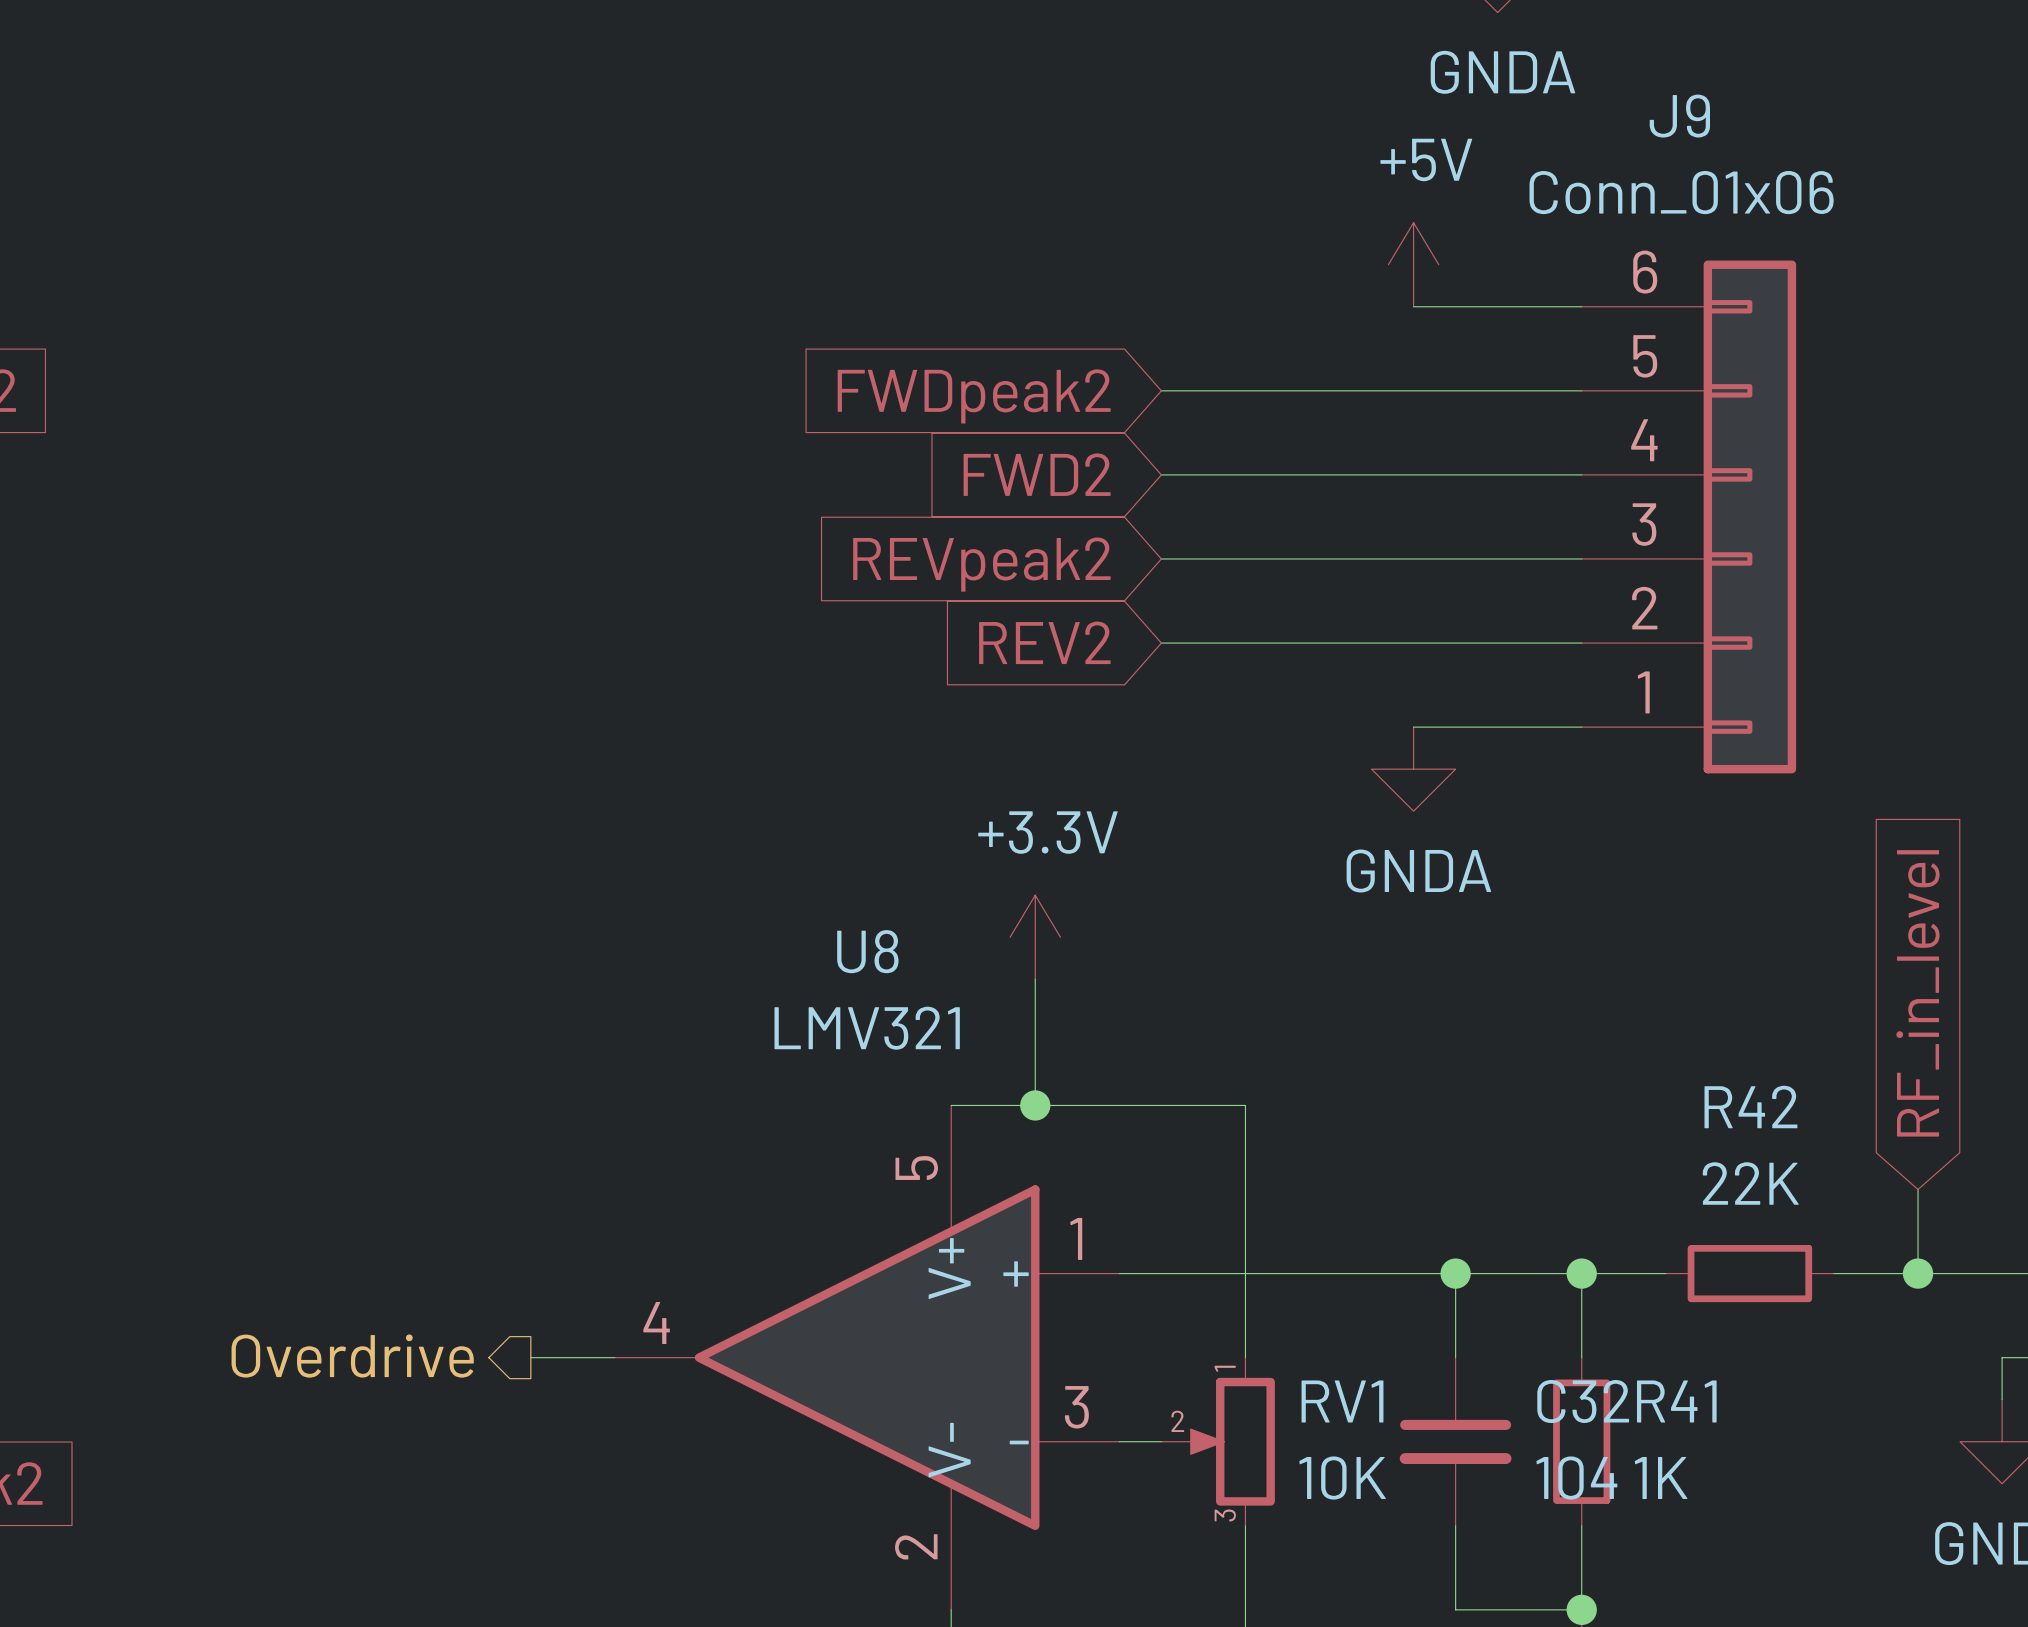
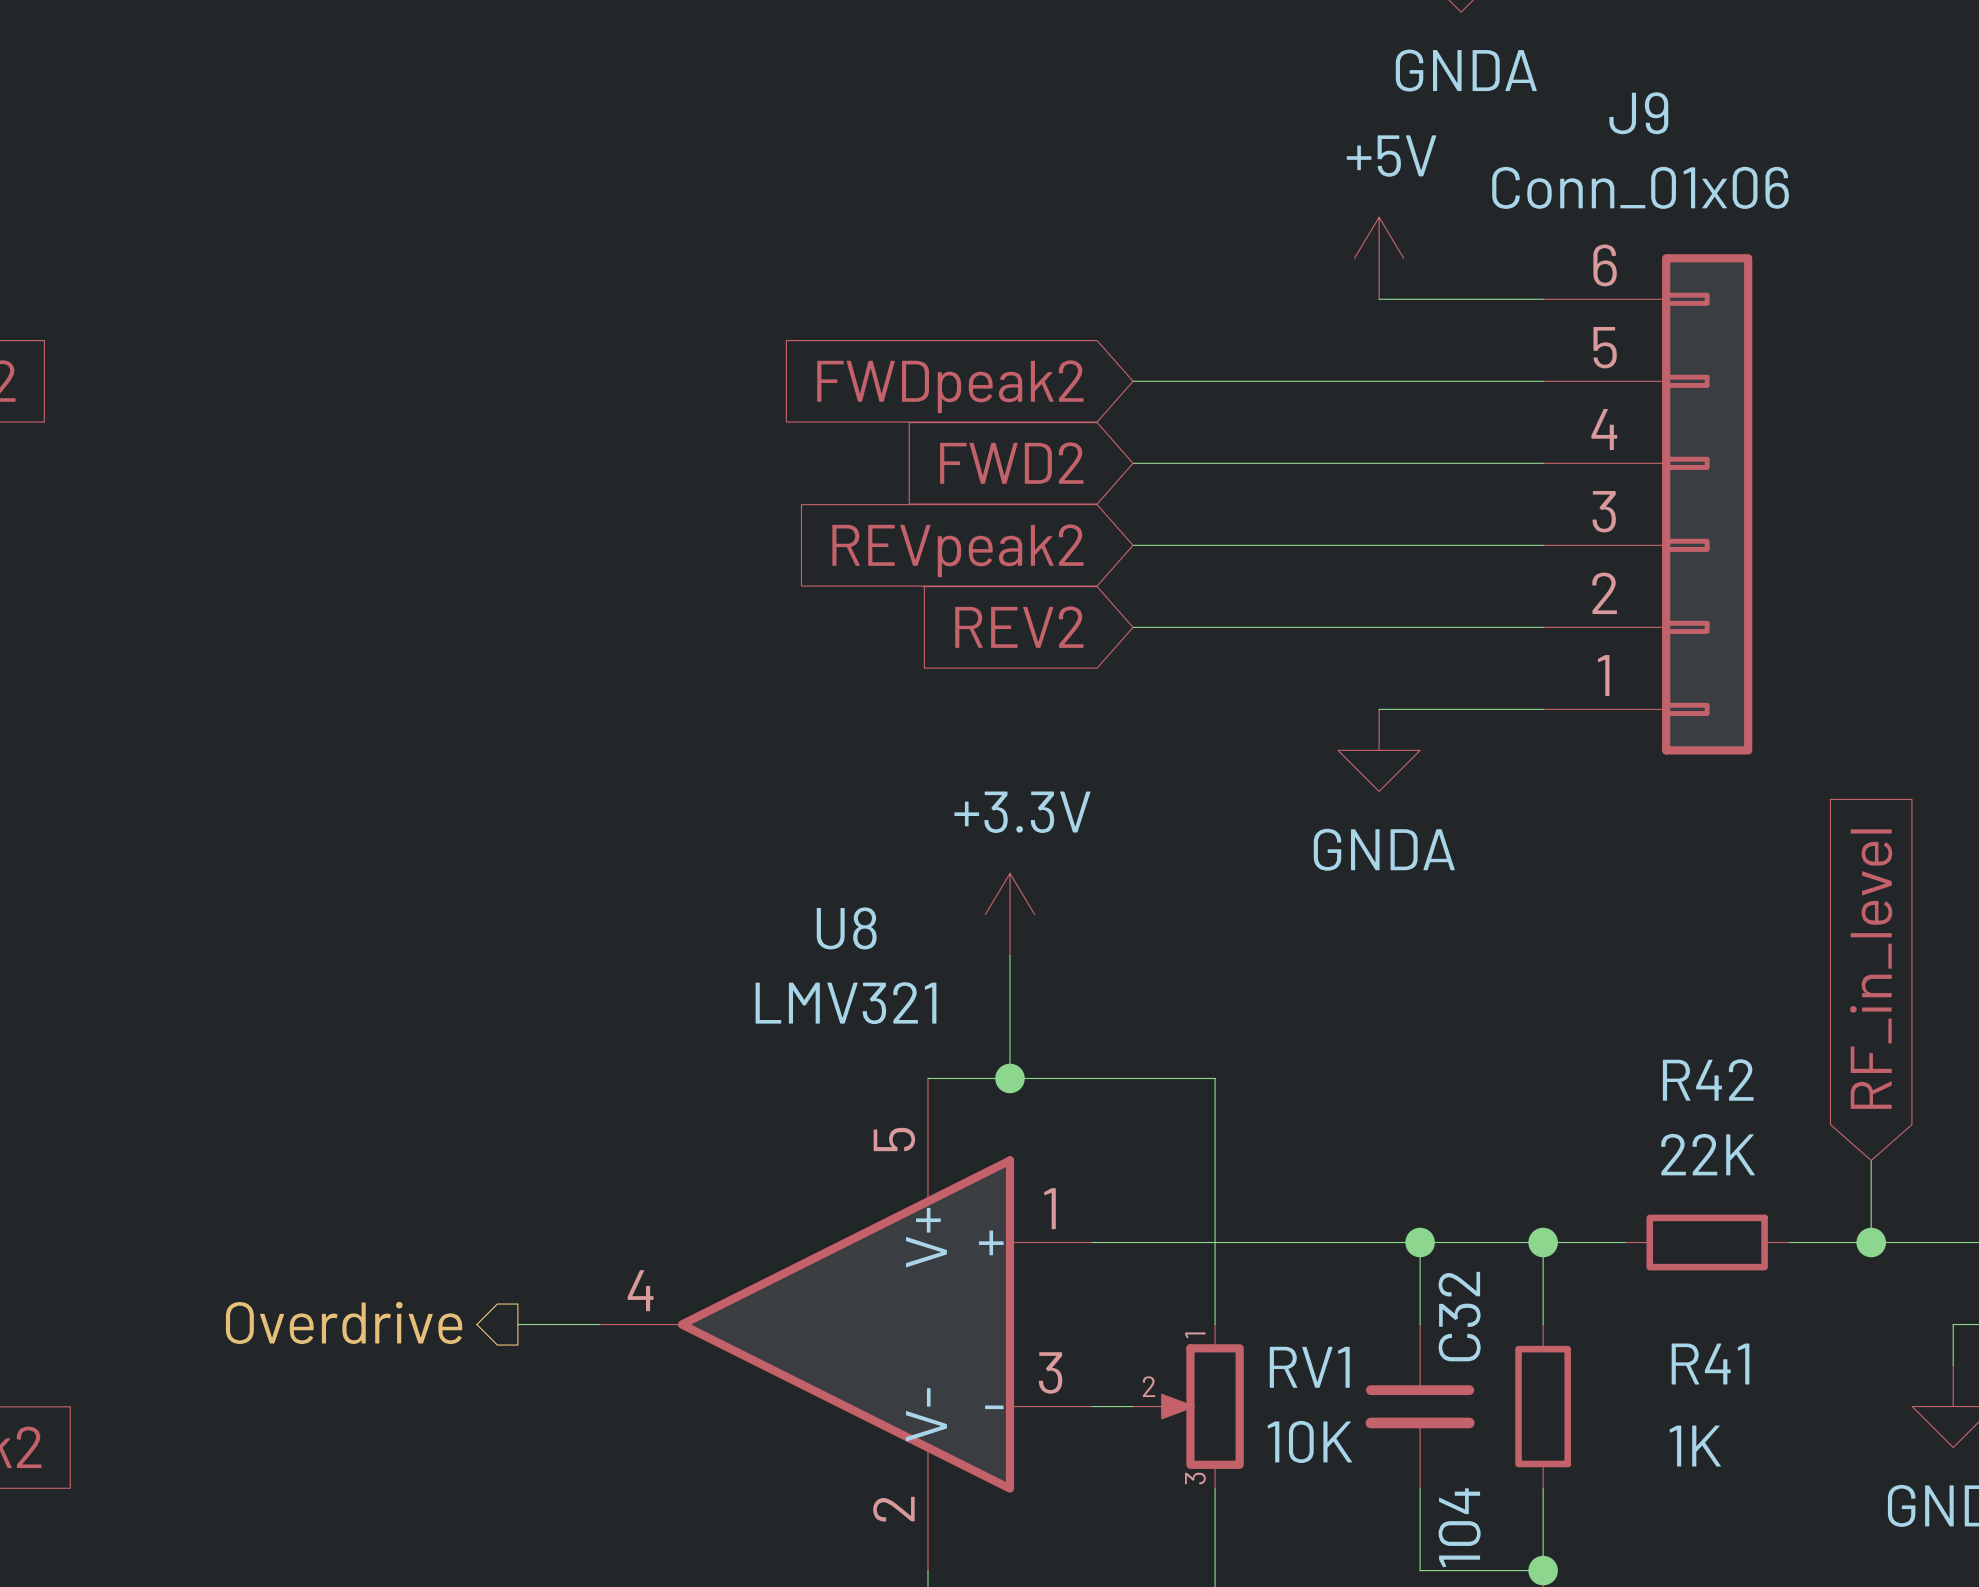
C32 name rotation: 0° (1583, 1401) -> 90° counterclockwise (1459, 1316)
R41 name position: R41 (1676, 1401) -> R41 (1710, 1364)
R41 value position: 1K (1661, 1477) -> 1K (1695, 1446)
C32 value rotation: 0° (1576, 1478) -> 90° counterclockwise (1459, 1527)

